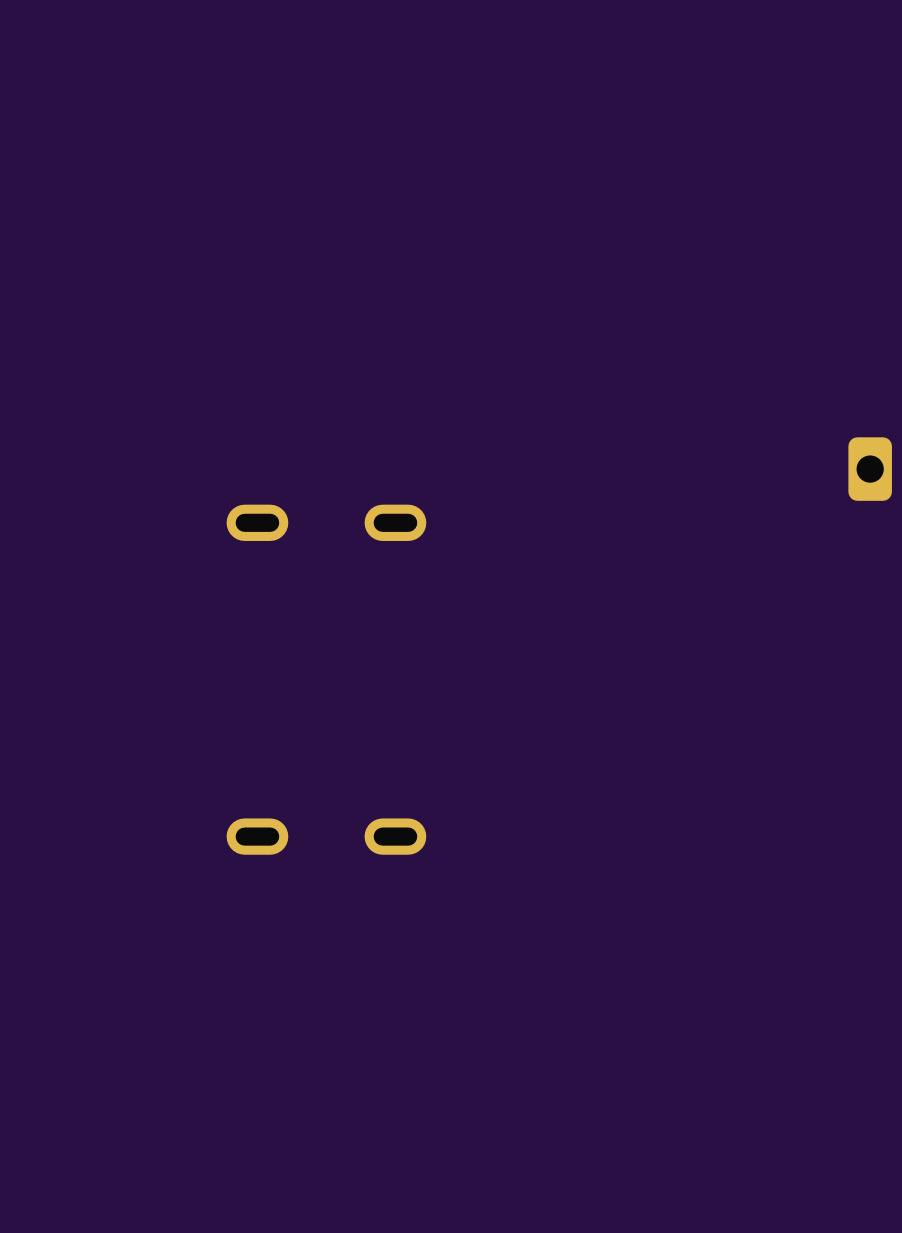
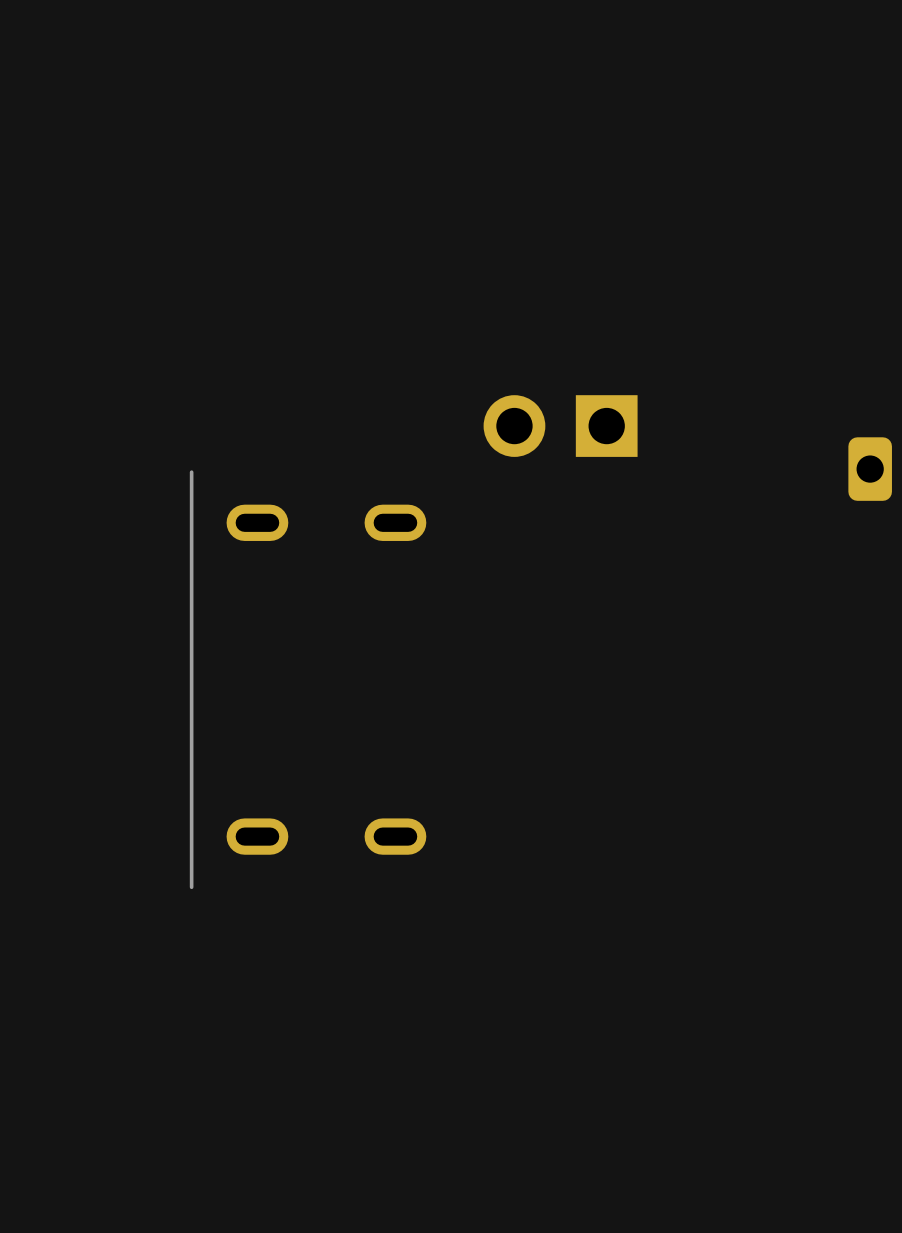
part: none -> (560, 426)
board edge: none -> (191, 472) (191, 887)

